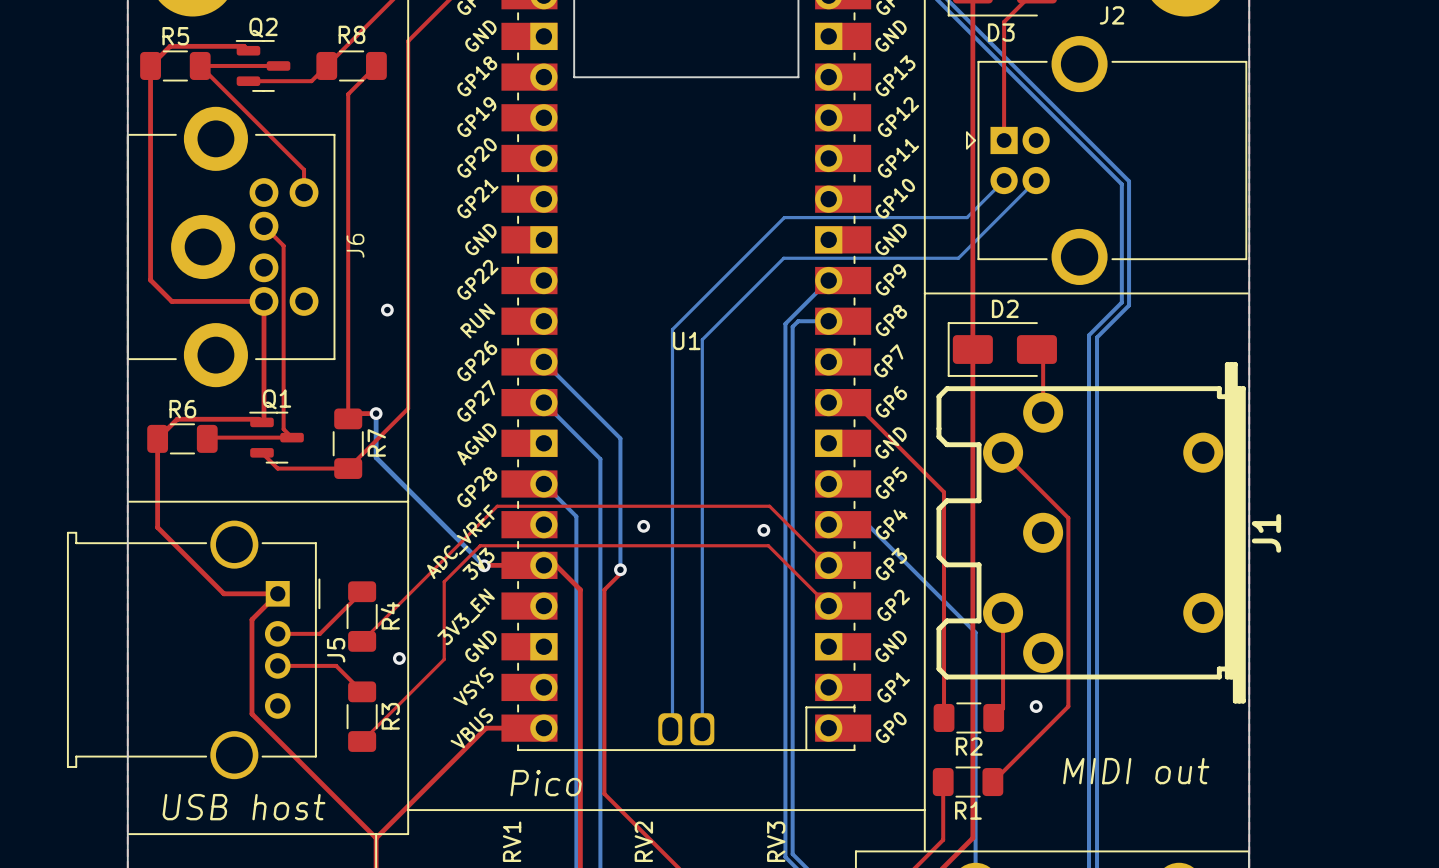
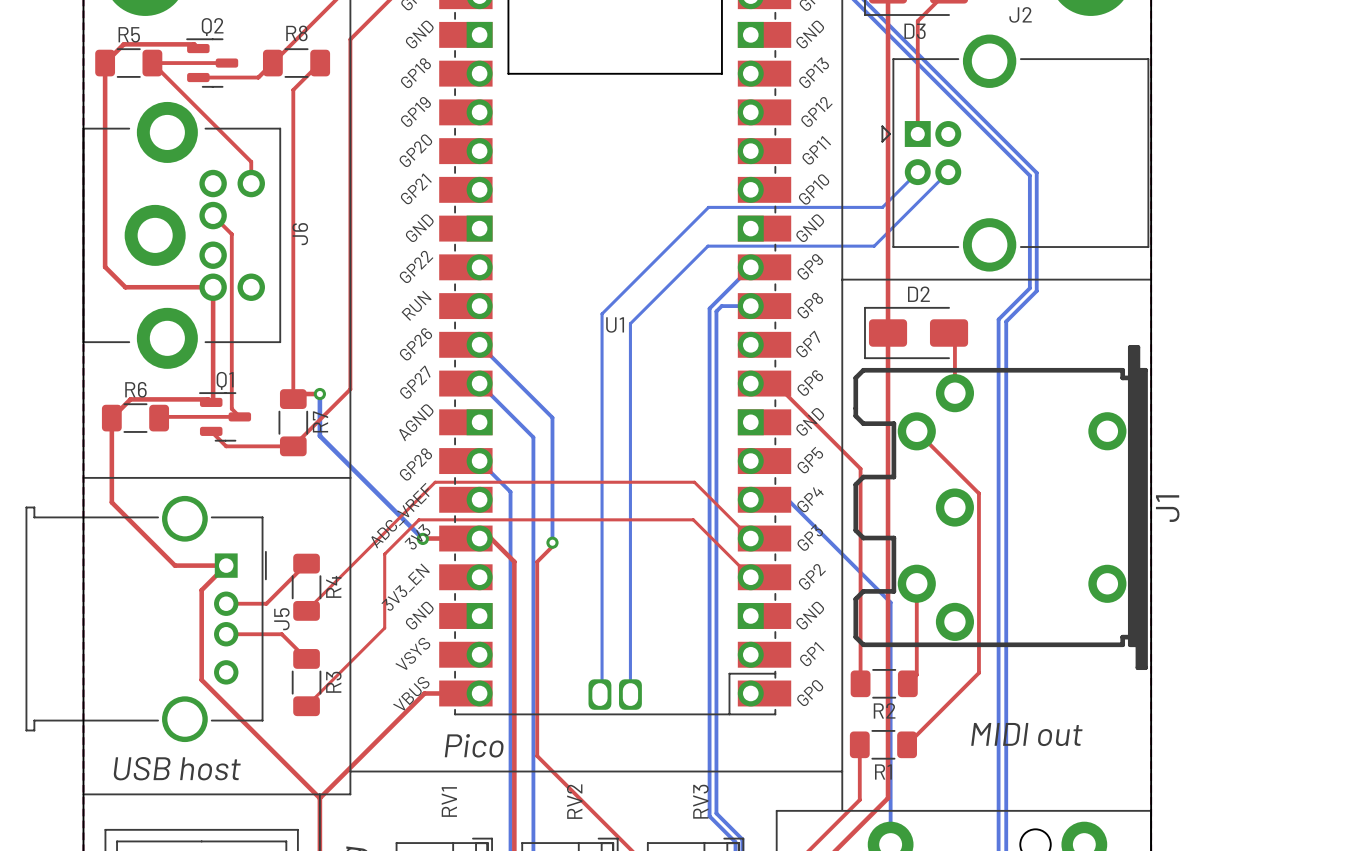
via: (387, 310) -> none
via: (643, 526) -> none
via: (763, 530) -> none
via: (399, 658) -> none
via: (1036, 706) -> none

